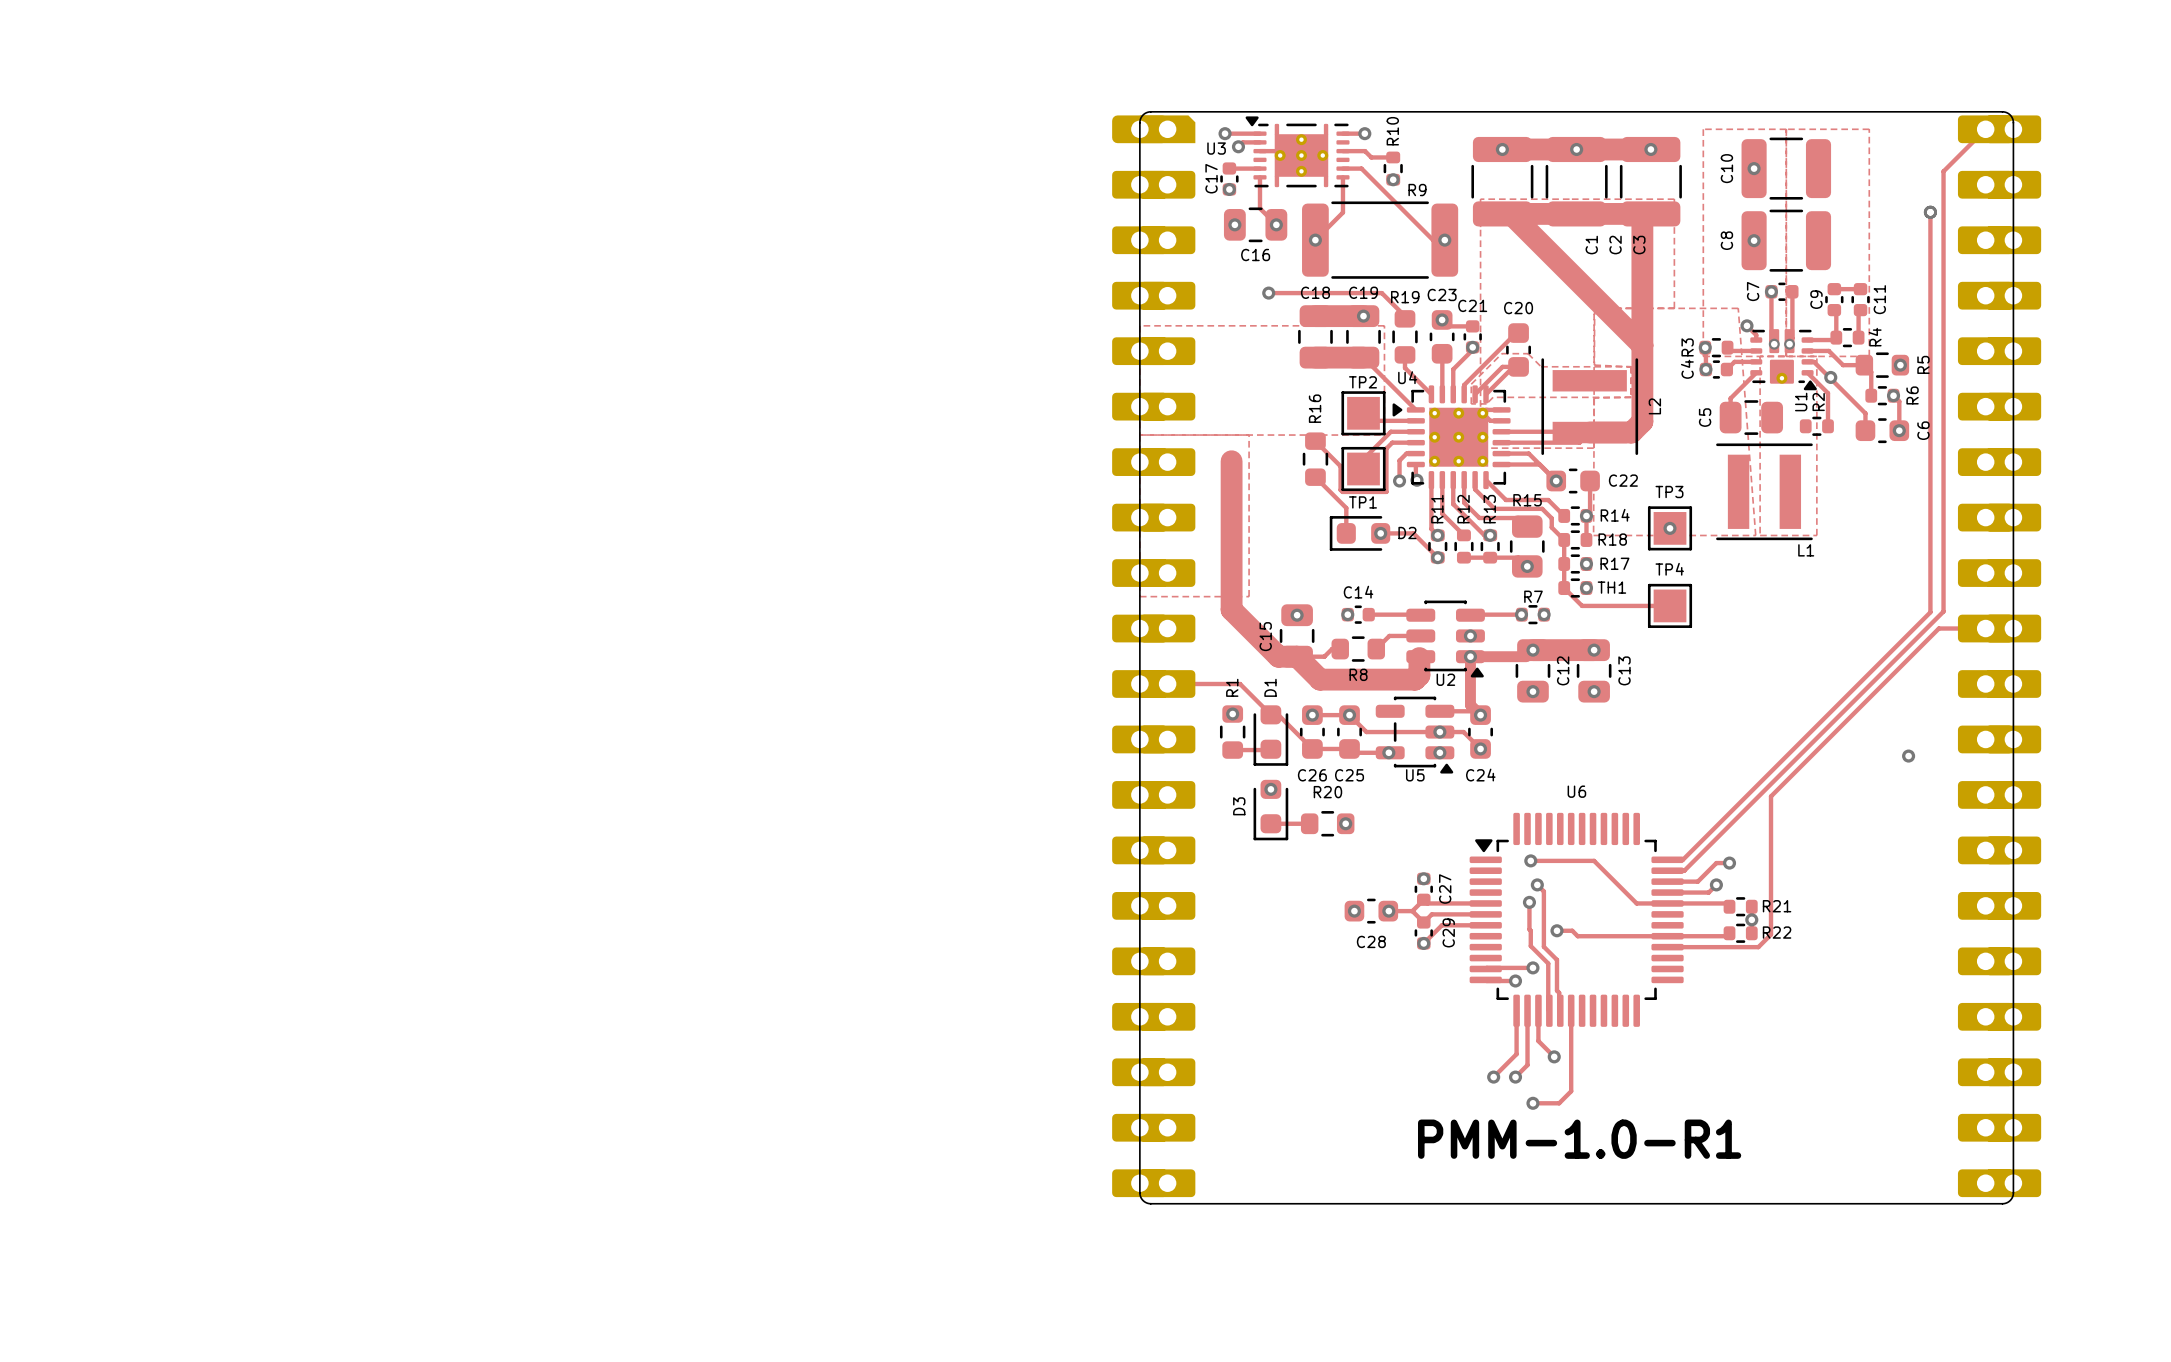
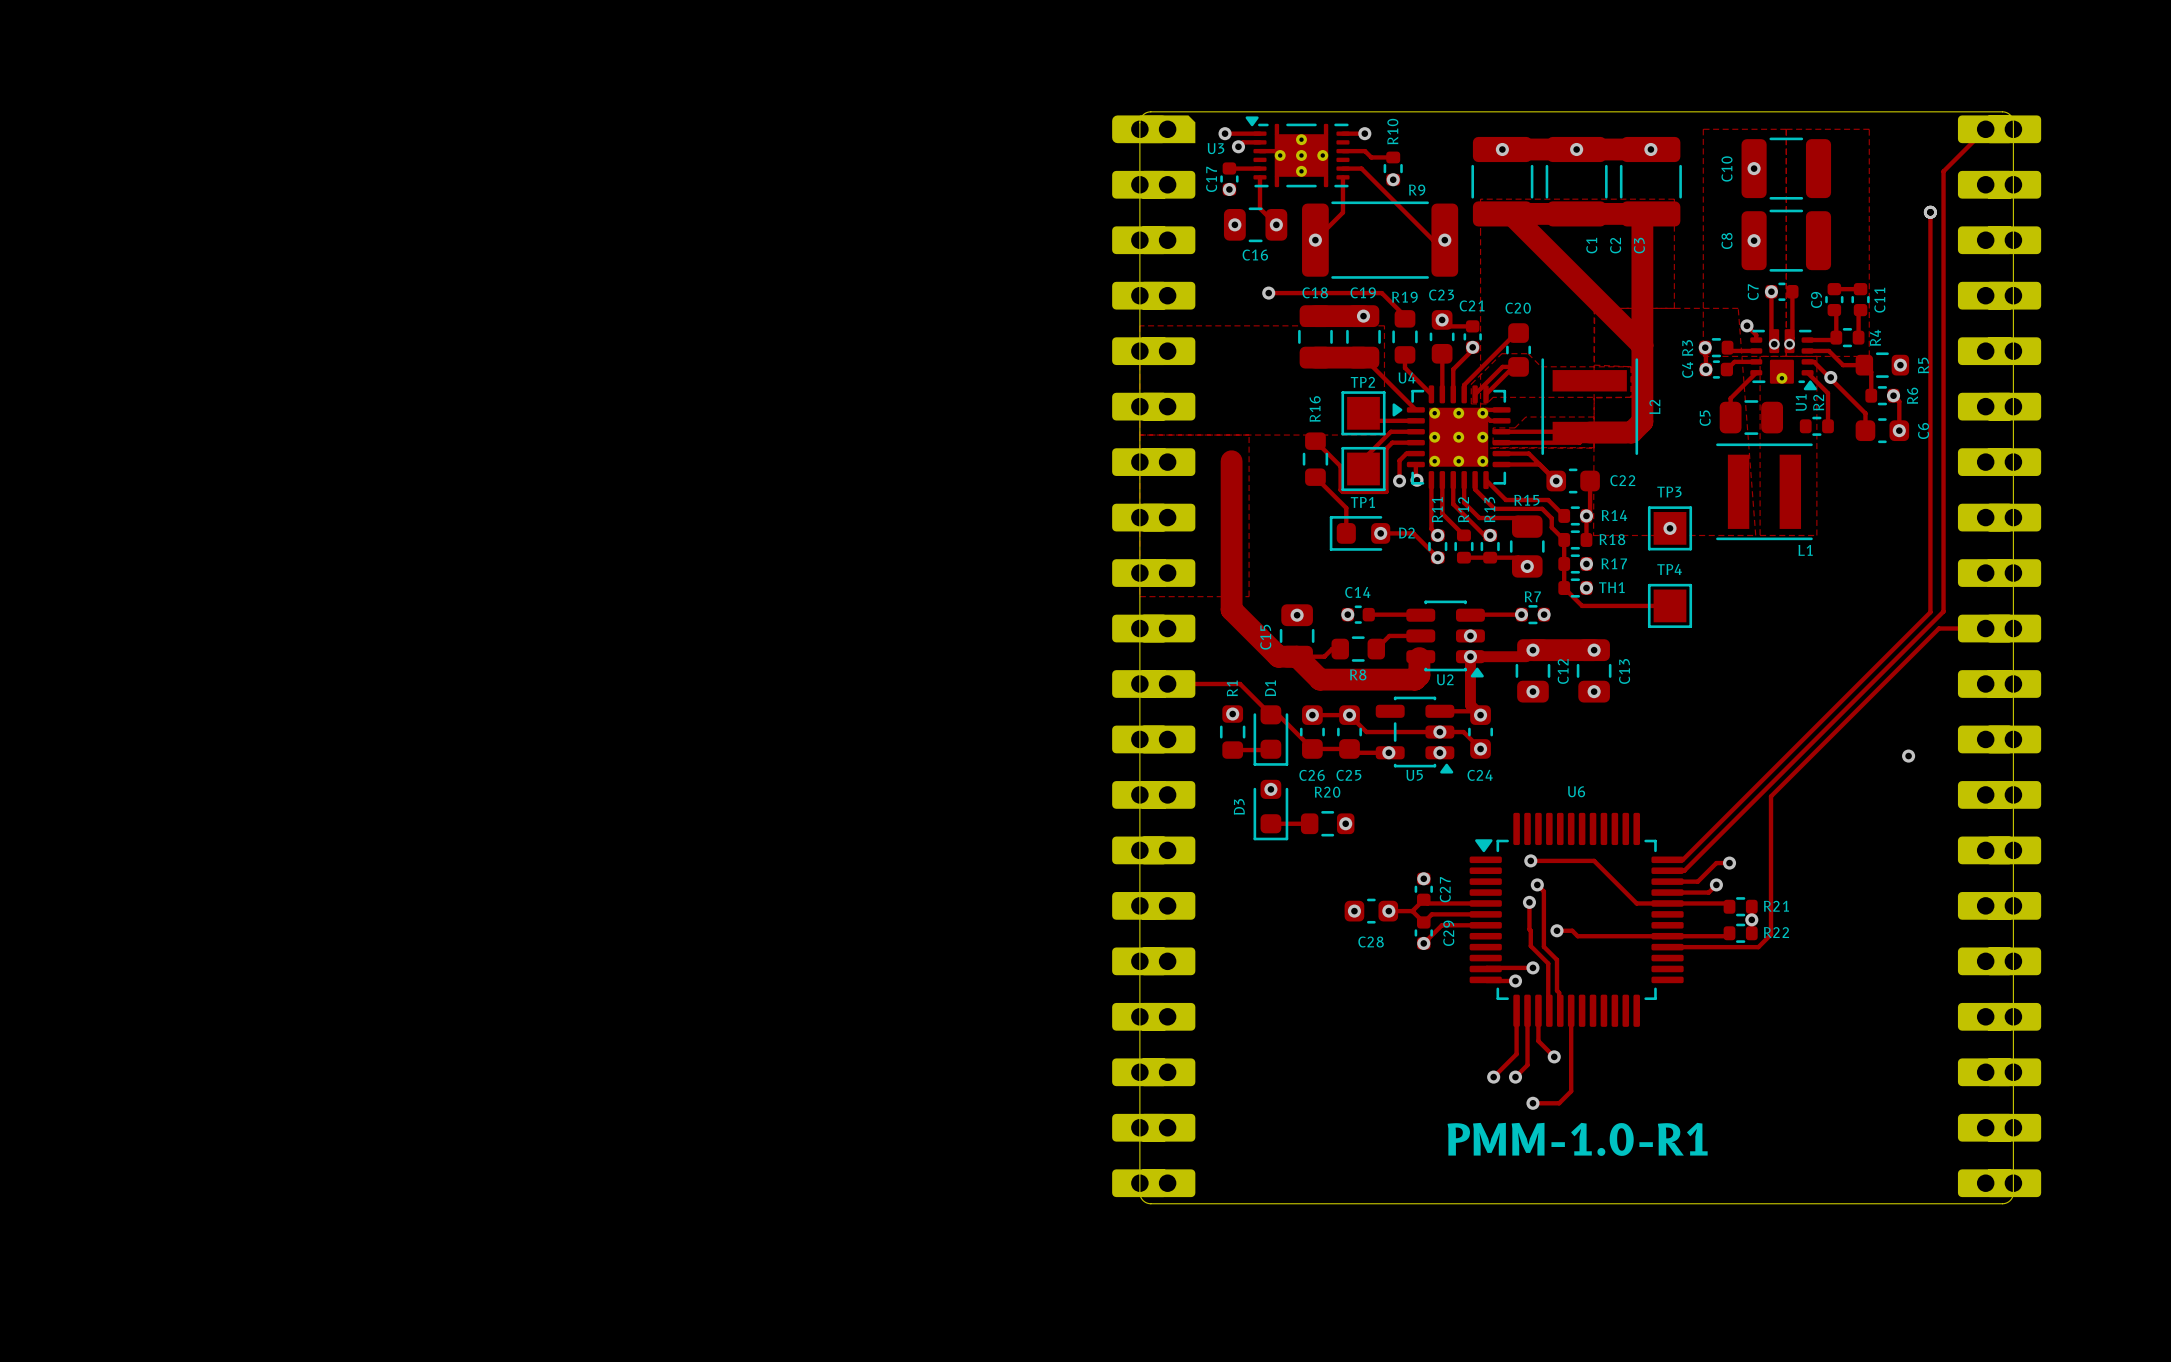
zone outline: none -> (1594, 417) (1525, 417) (1514, 427) (1493, 427) (1493, 447) (1594, 447)

